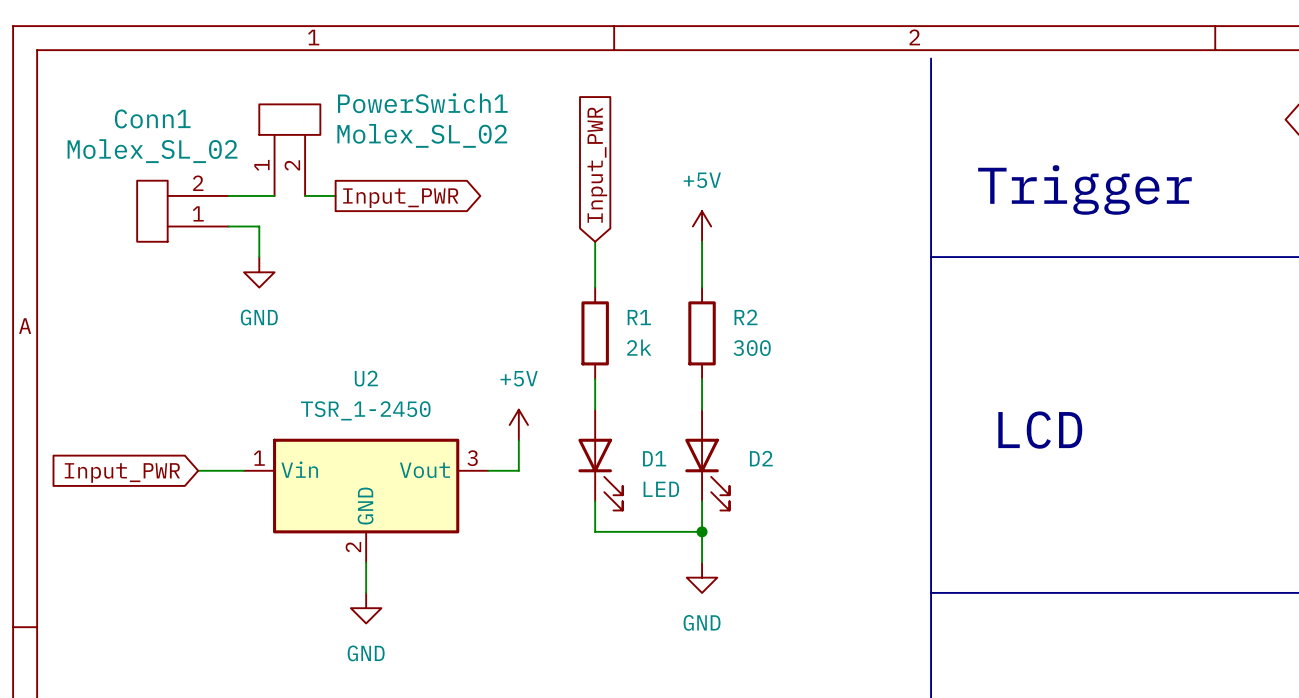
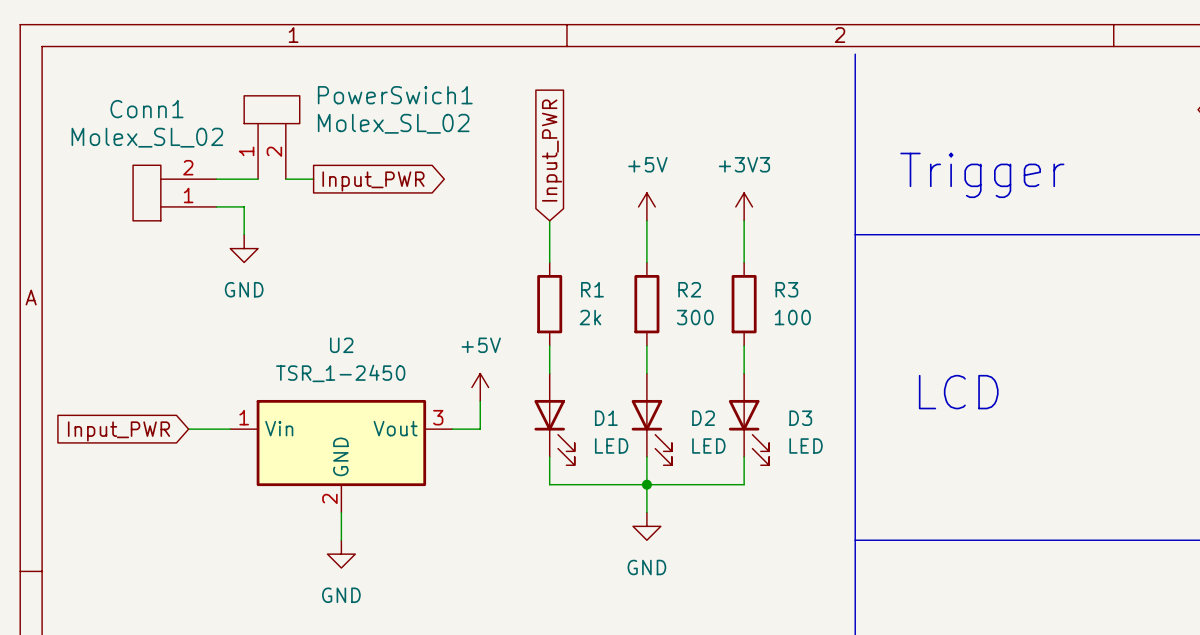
power symbol: none -> +3V3 (744, 206)
wire: none -> (744, 220) (744, 262)
R3: none -> 100 (744, 304)
wire: none -> (744, 345) (744, 373)
D3: none -> LED (748, 419)
D2 value: none -> LED (708, 445)
wire: none -> (744, 456) (744, 484) (646, 484)

